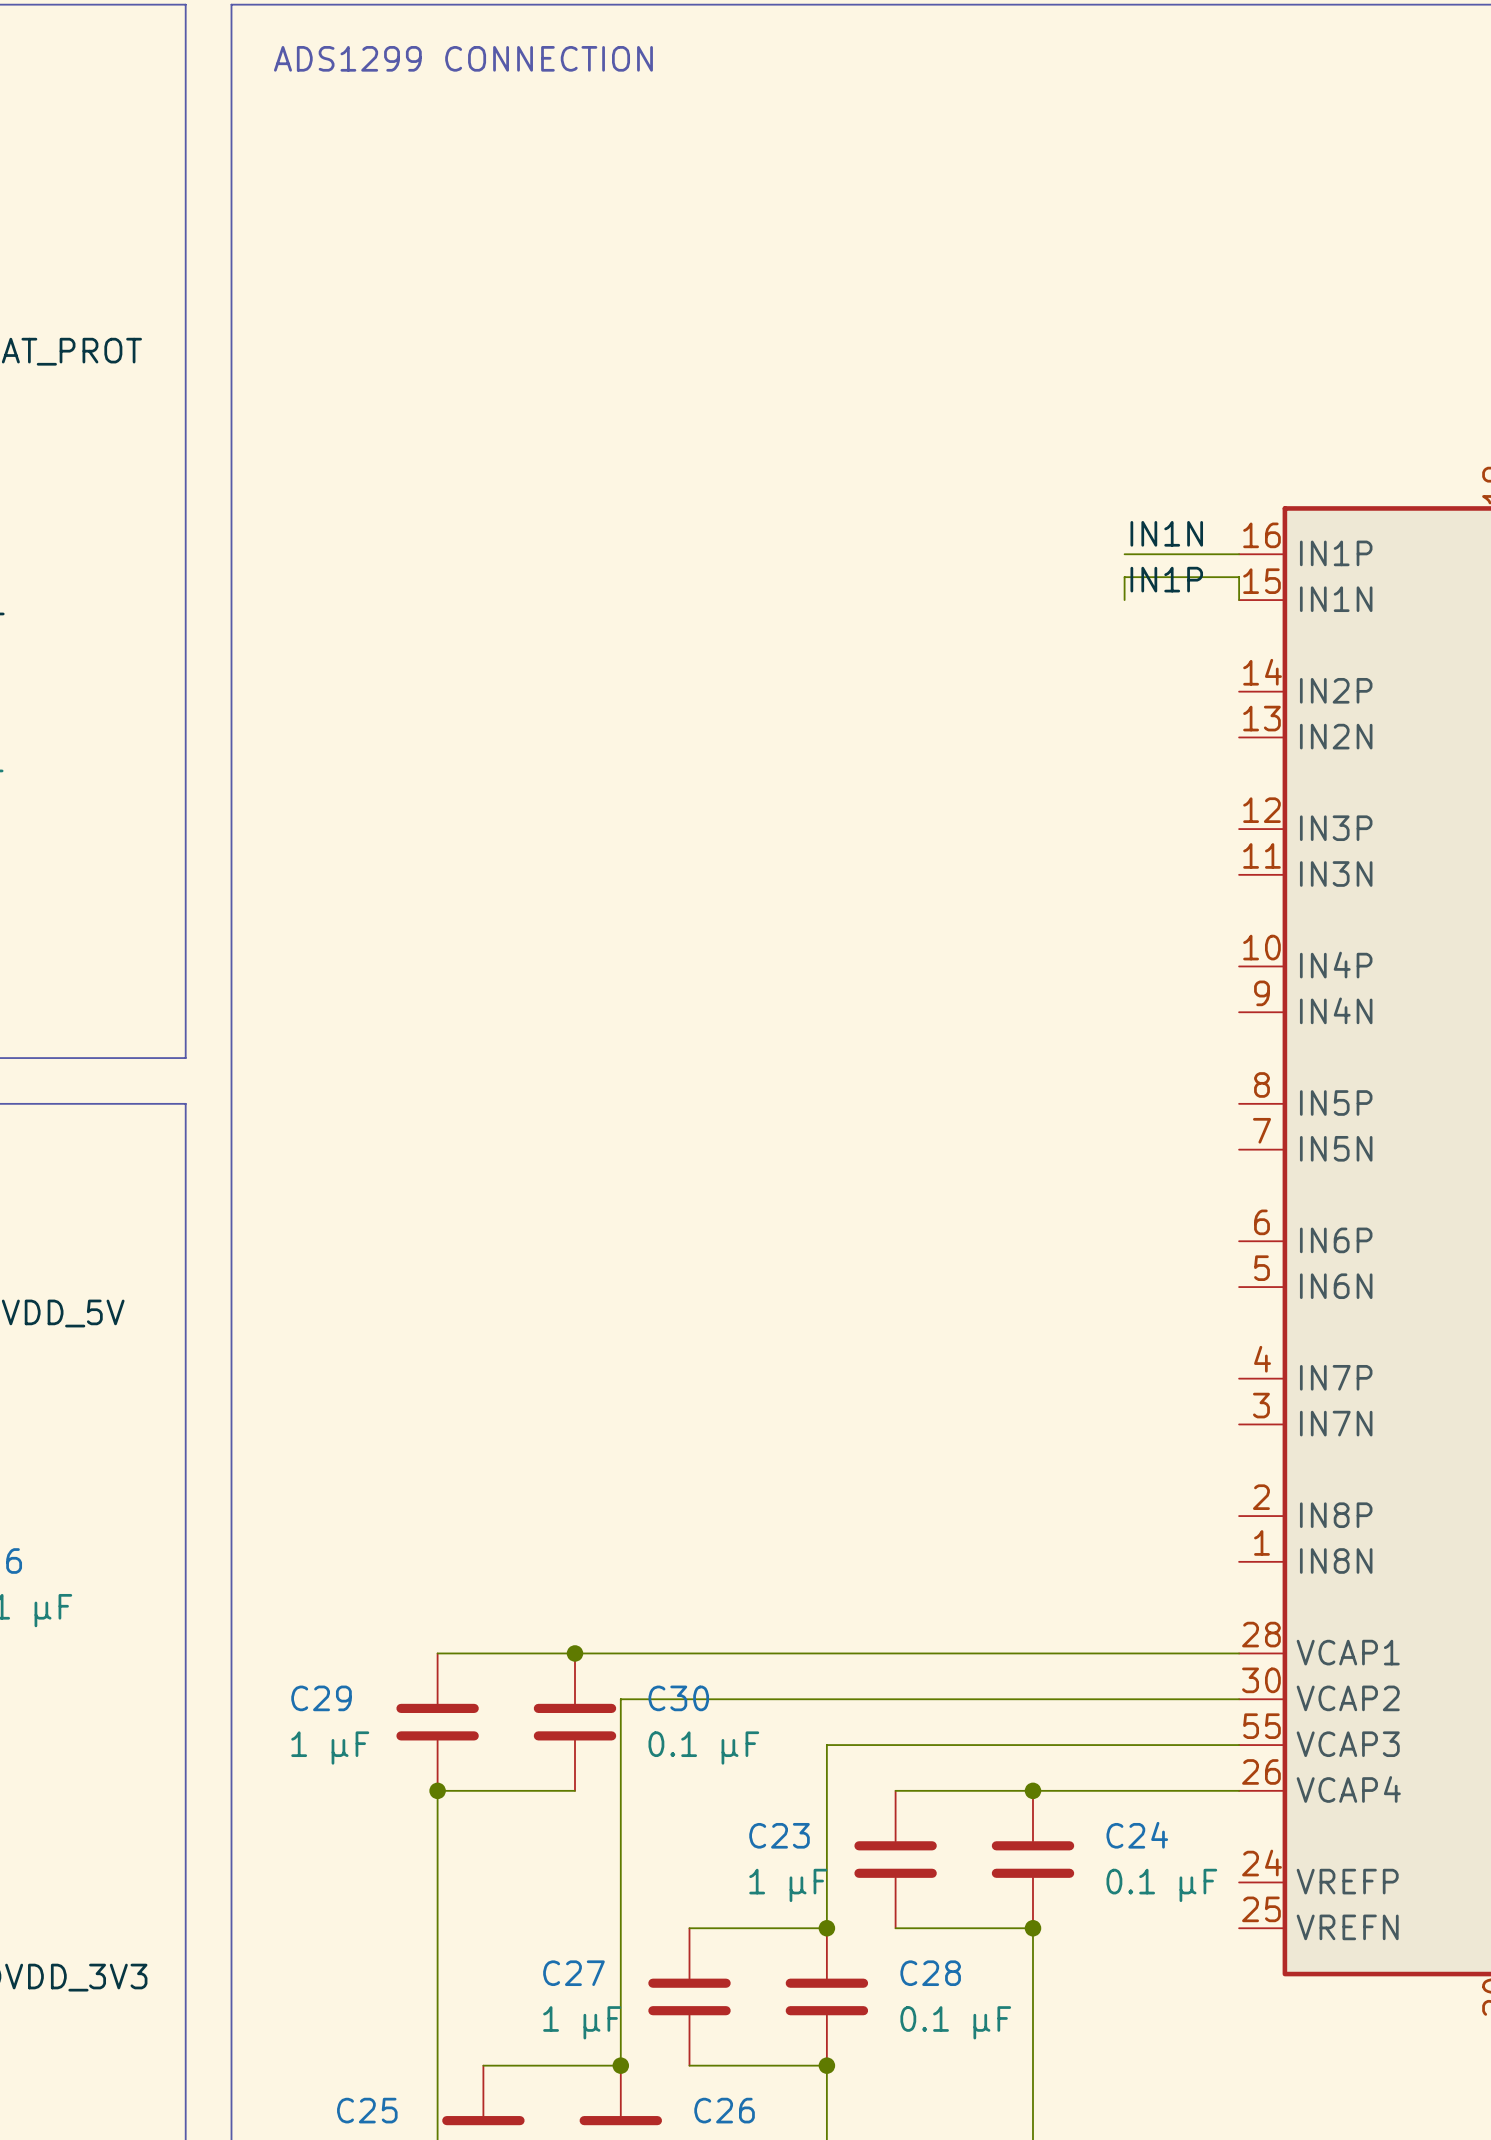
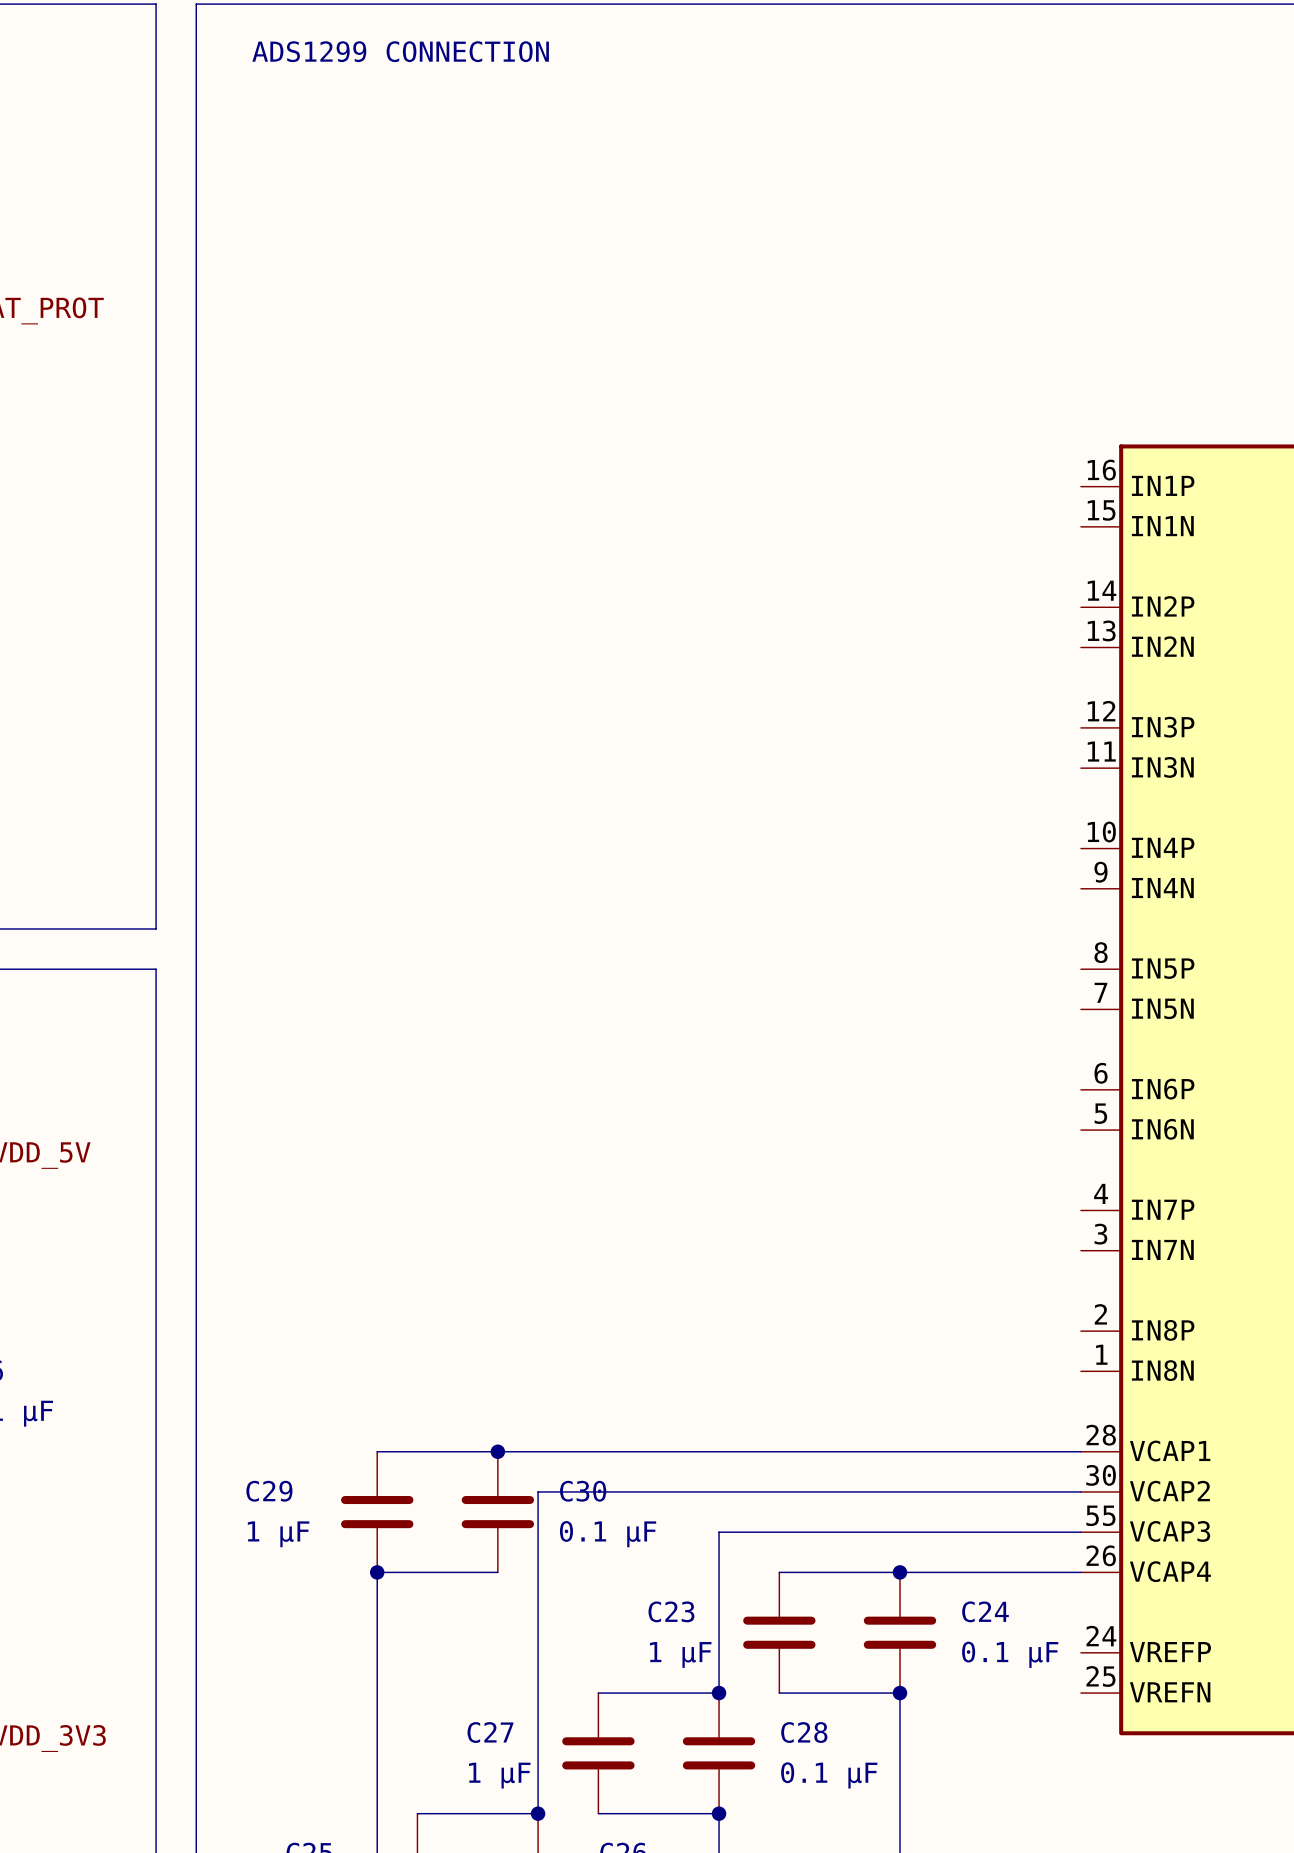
label: IN1N (1166, 533) -> none
wire: (1124, 554) (1239, 554) -> none
label: IN1P (1166, 579) -> none
wire: (1124, 600) (1124, 577) (1239, 577) (1239, 600) -> none

